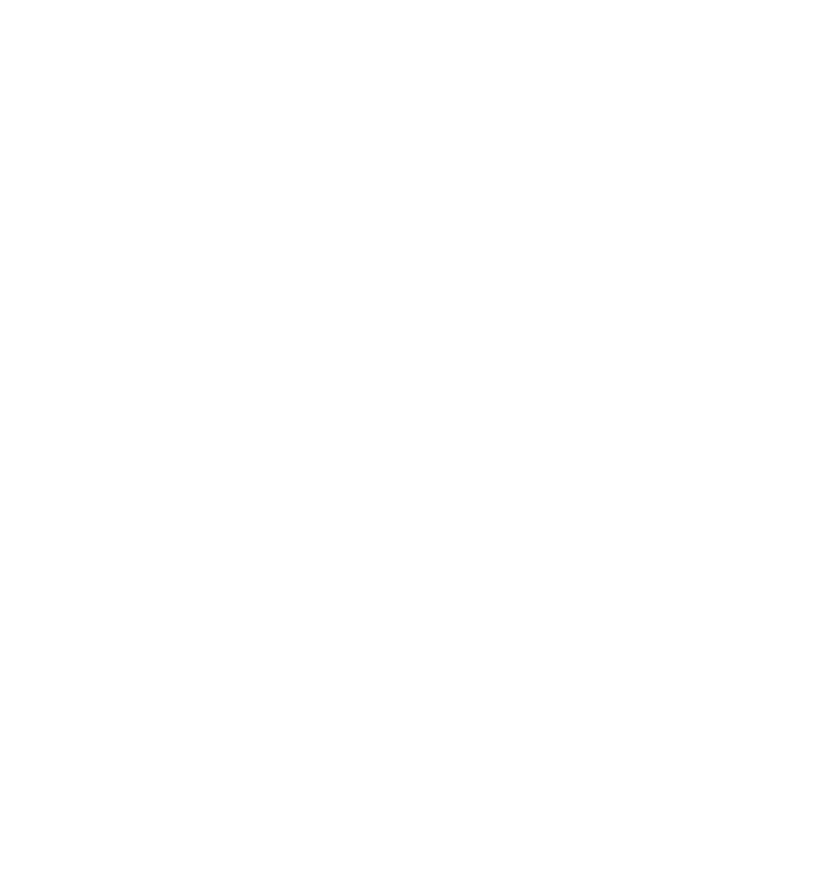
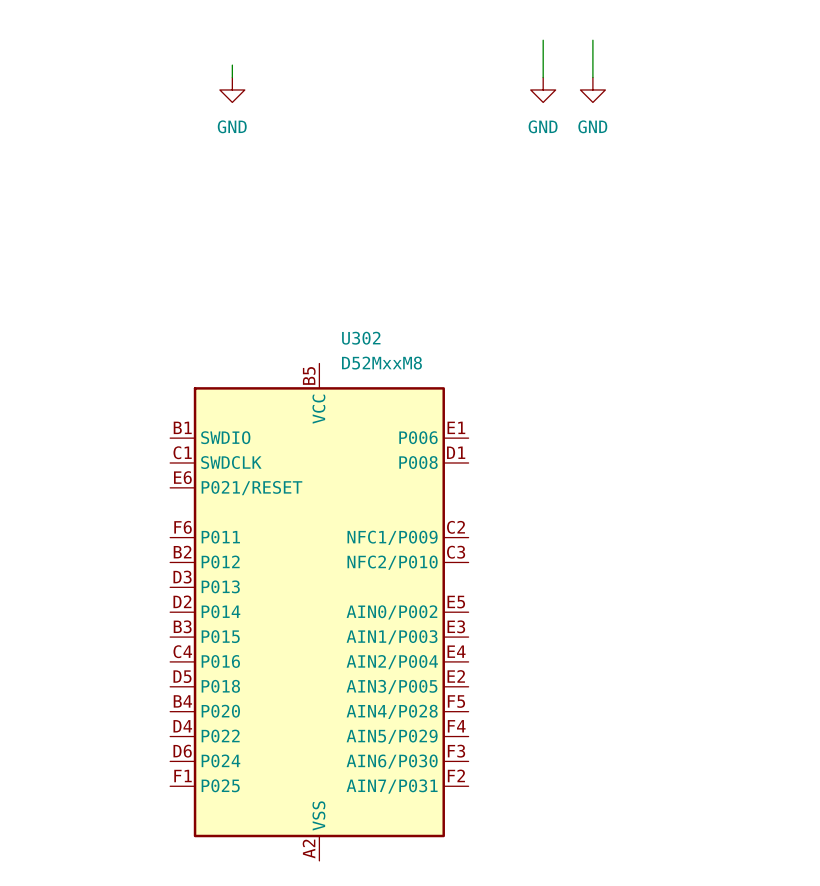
wire: none -> (543, 40) (543, 77)
wire: none -> (592, 40) (592, 77)
wire: none -> (232, 65) (232, 77)
power symbol: none -> GND (232, 89)
power symbol: none -> GND (543, 89)
power symbol: none -> GND (592, 89)
U302: none -> D52MxxM8 (319, 612)

